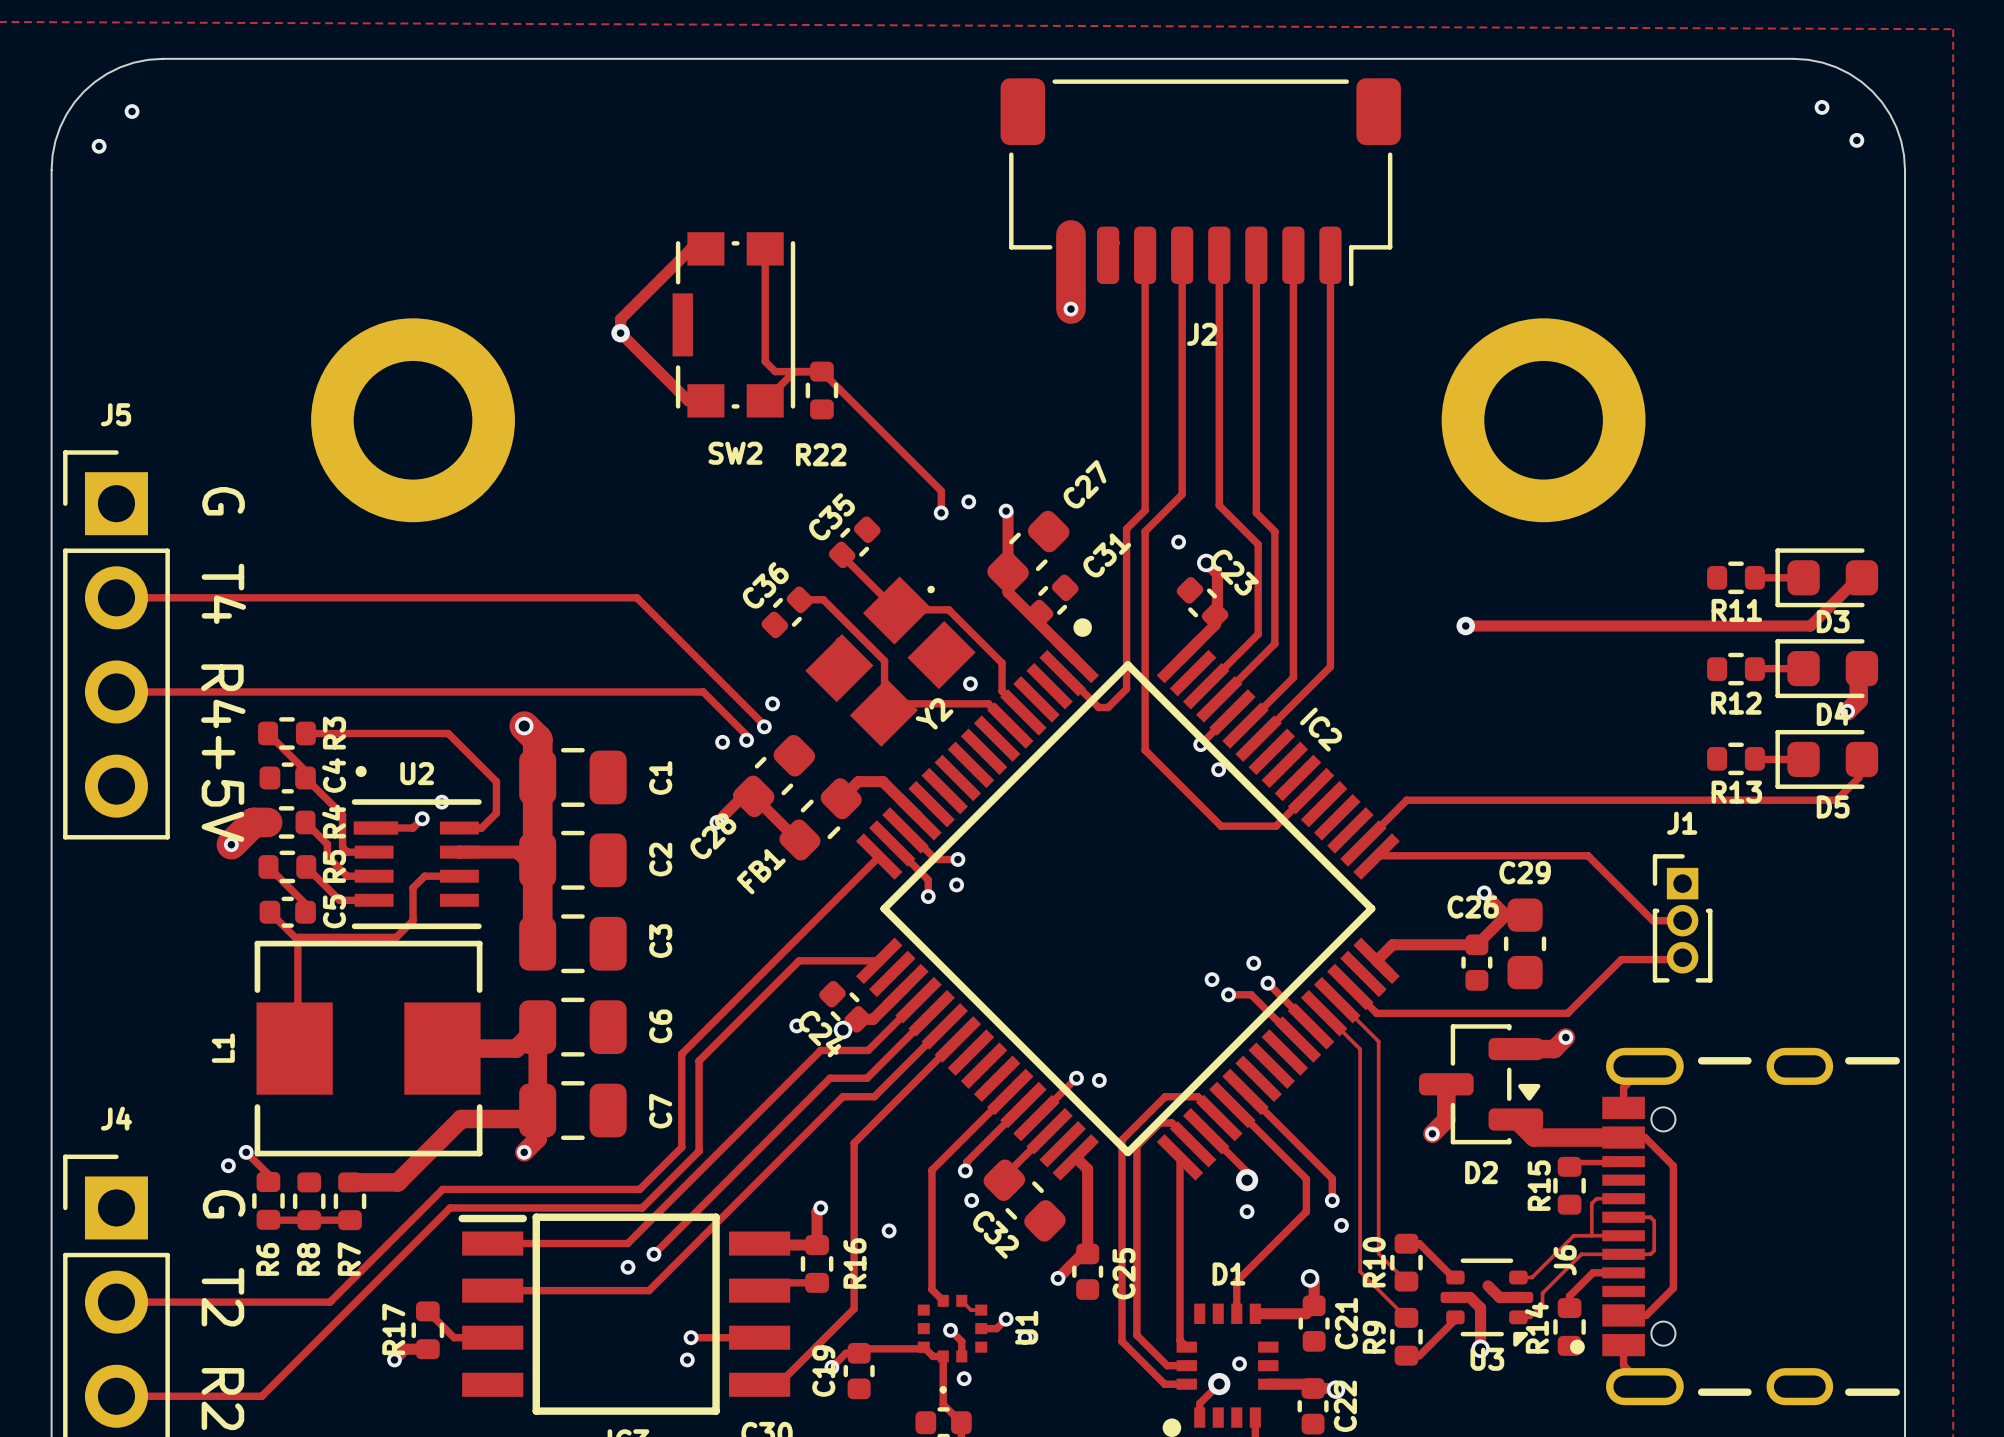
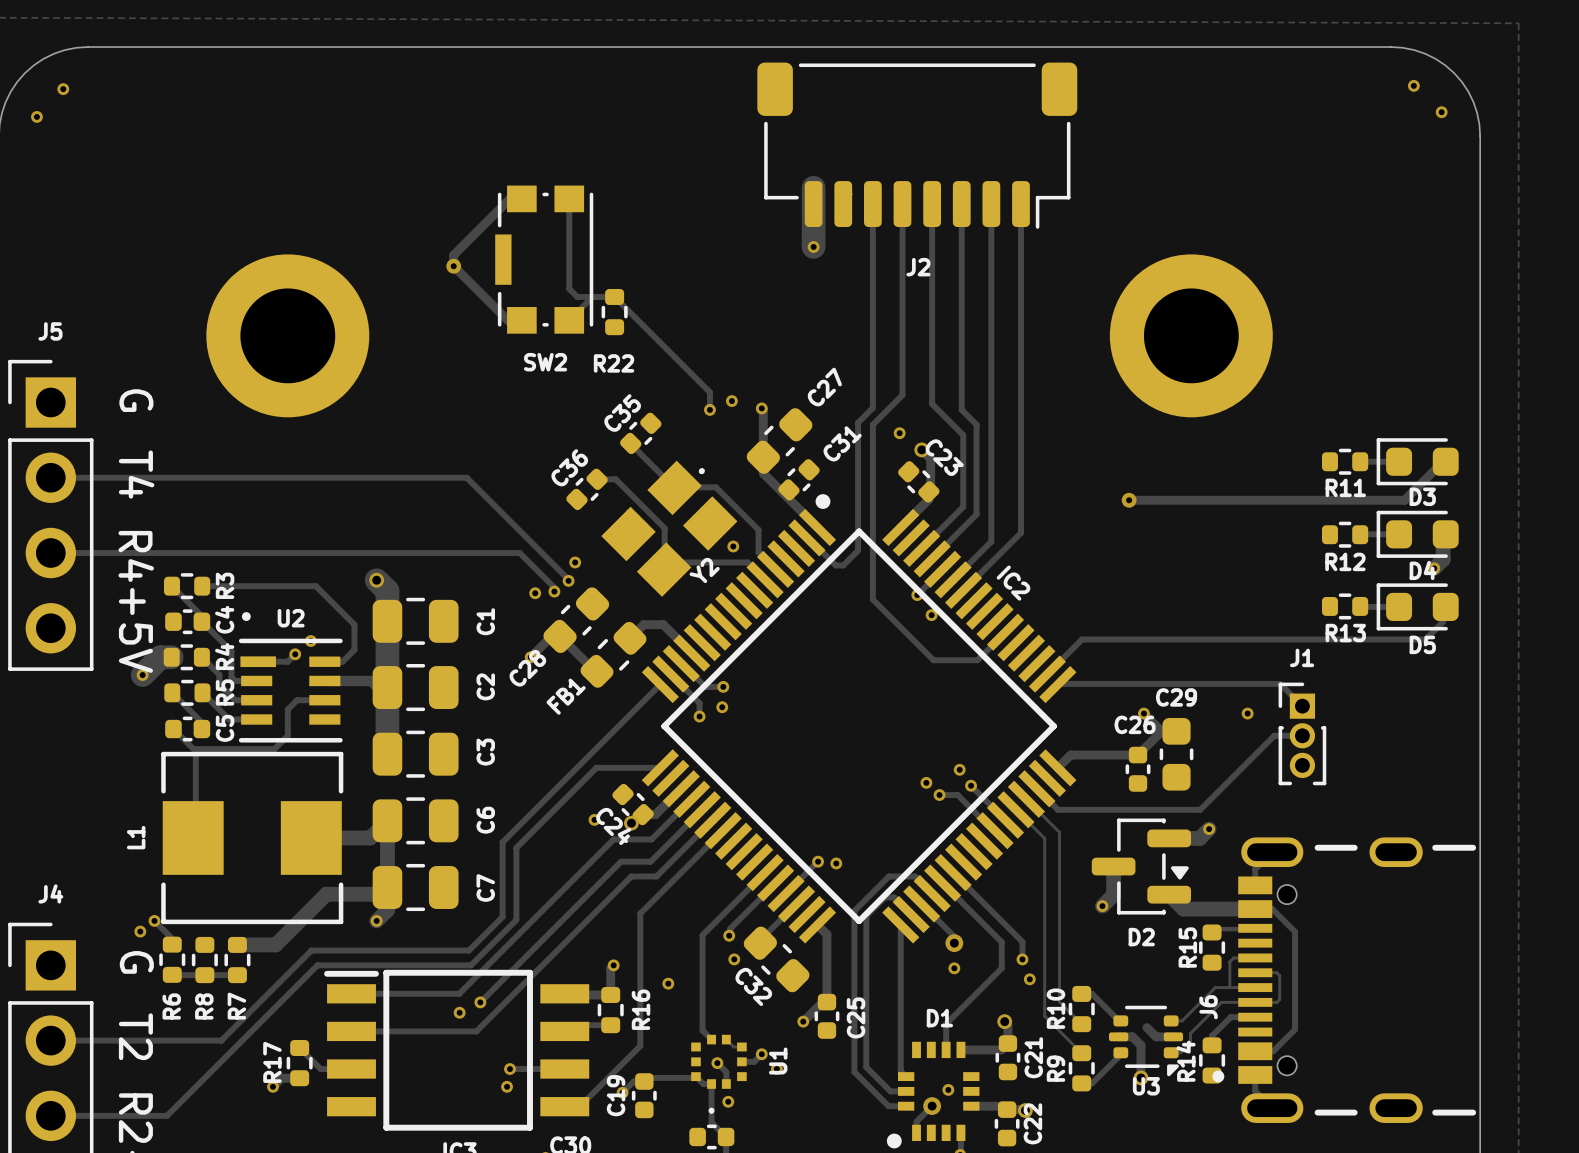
track: (1588, 855) (1652, 920) -> (1226, 683) (1280, 683) (1302, 706)
via: none -> (1247, 713)
track: (1682, 957) (1680, 959) (1621, 959) (1567, 1013) (1554, 1013) -> (1278, 735) (1274, 735) (1200, 809)

